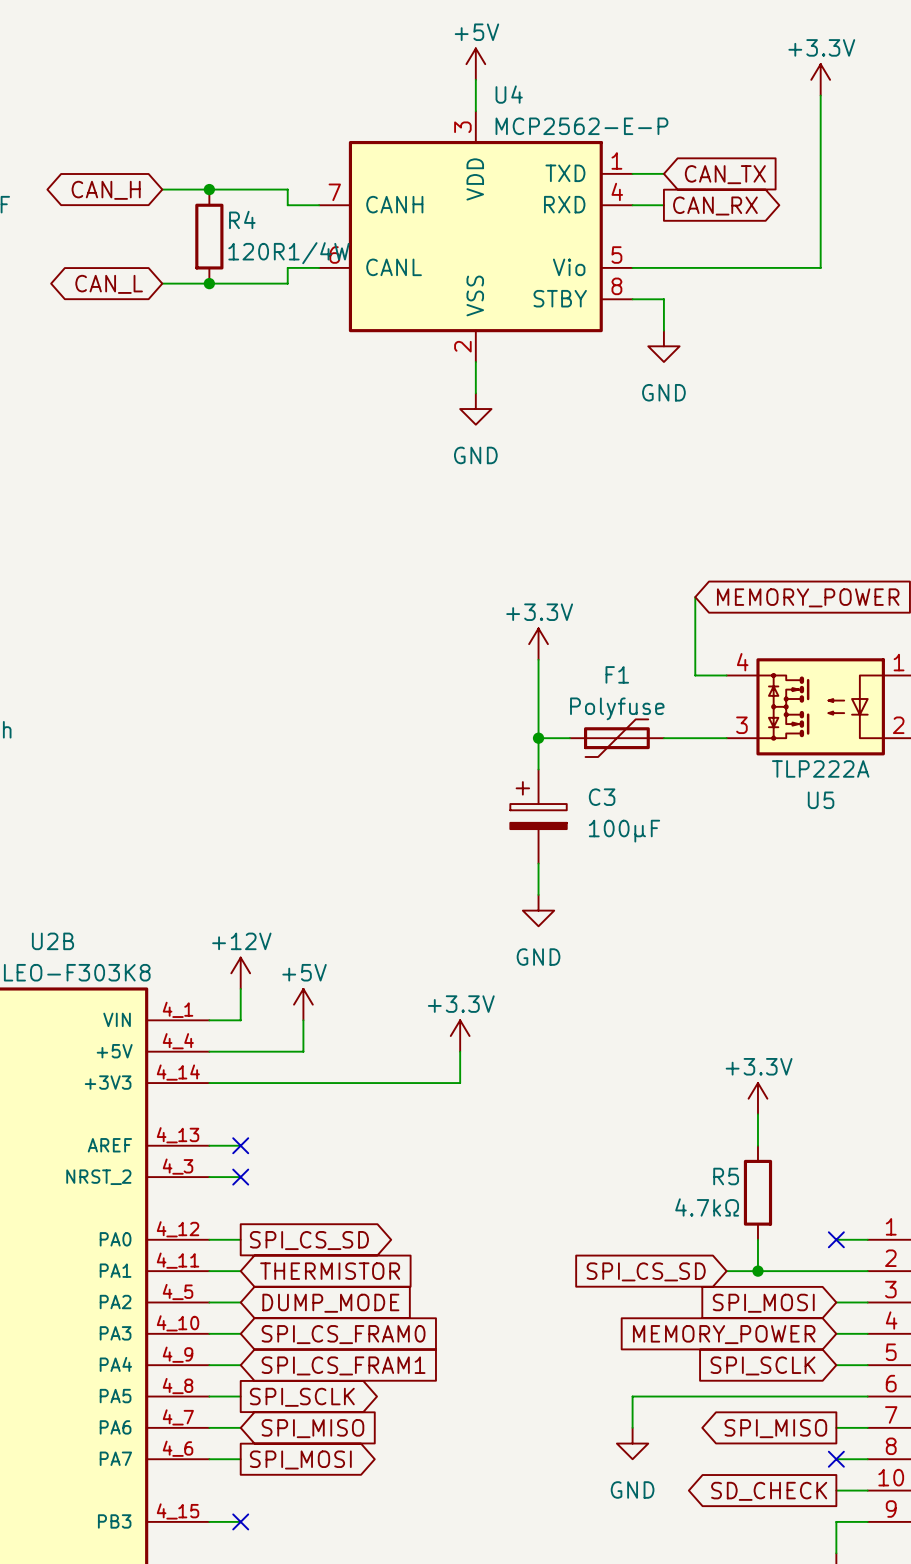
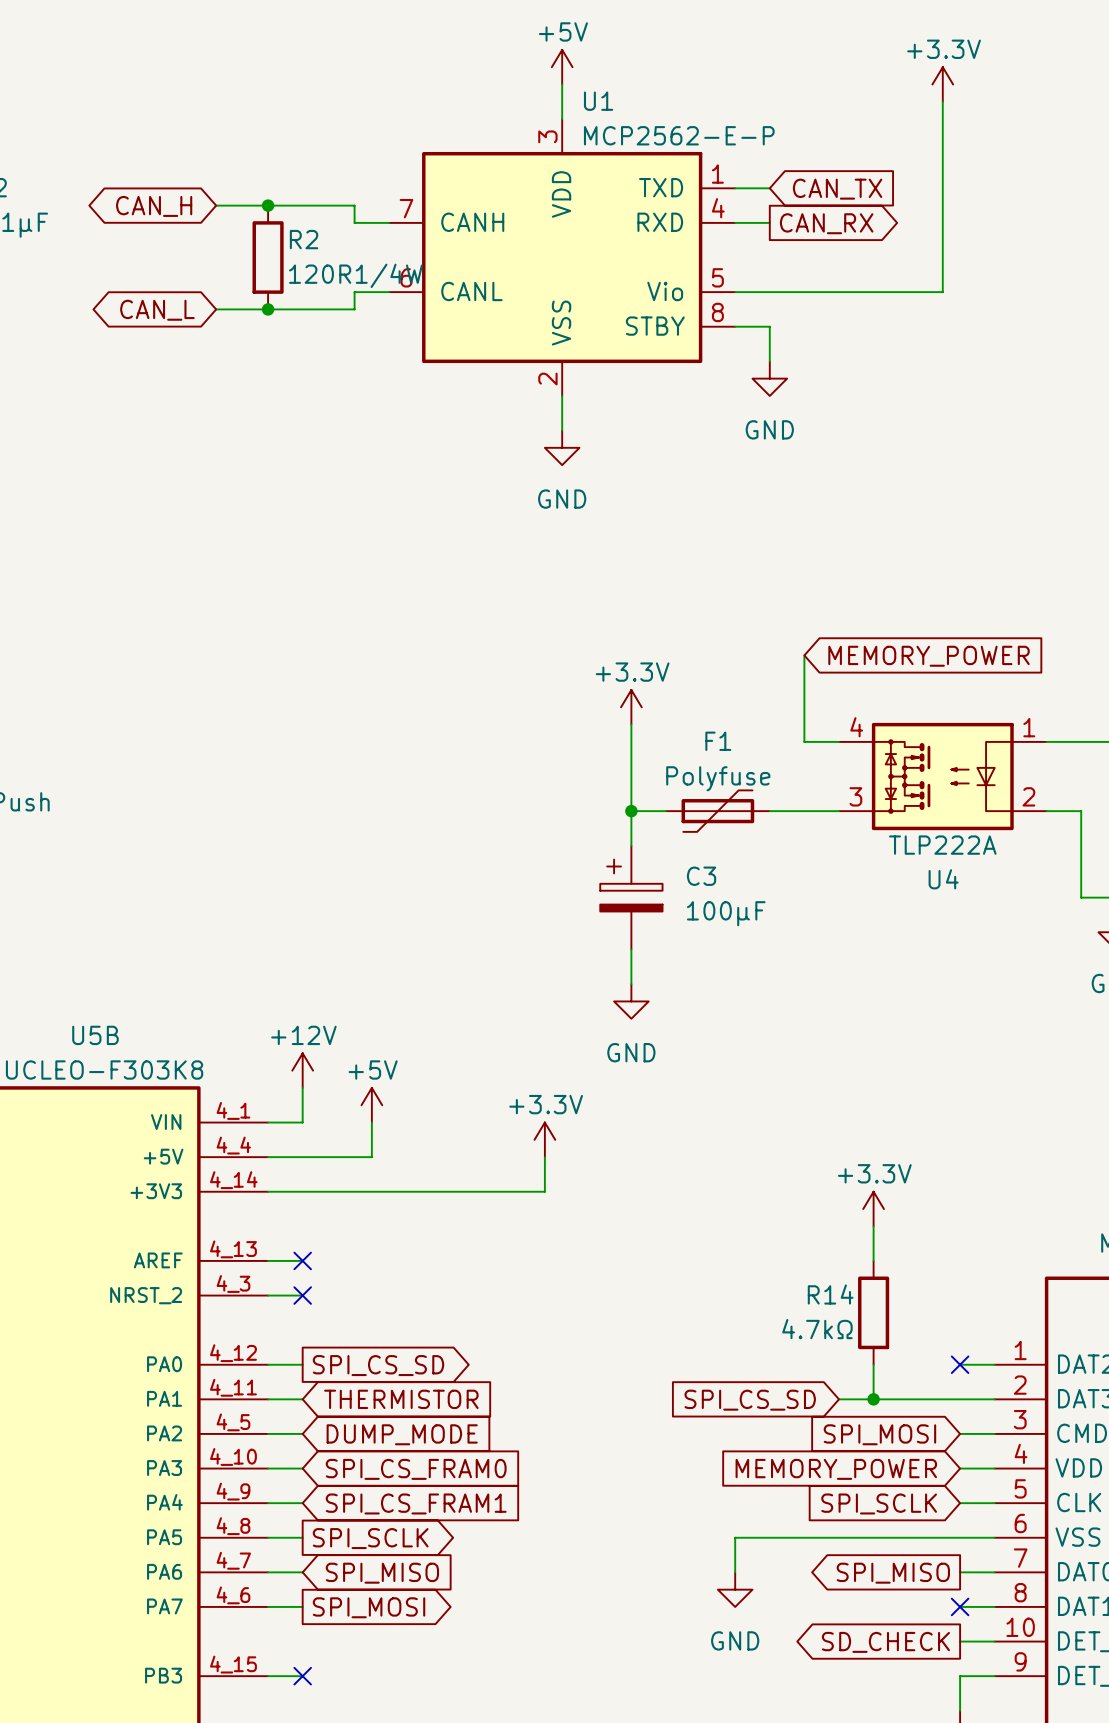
U4 name: U4 (509, 94) -> U1 (598, 101)
R4 name: R4 (242, 219) -> R2 (304, 239)
U5 name: U5 (821, 800) -> U4 (943, 879)
U2B name: U2B (52, 941) -> U5B (95, 1035)
R5 name: R5 (726, 1176) -> R14 (830, 1294)

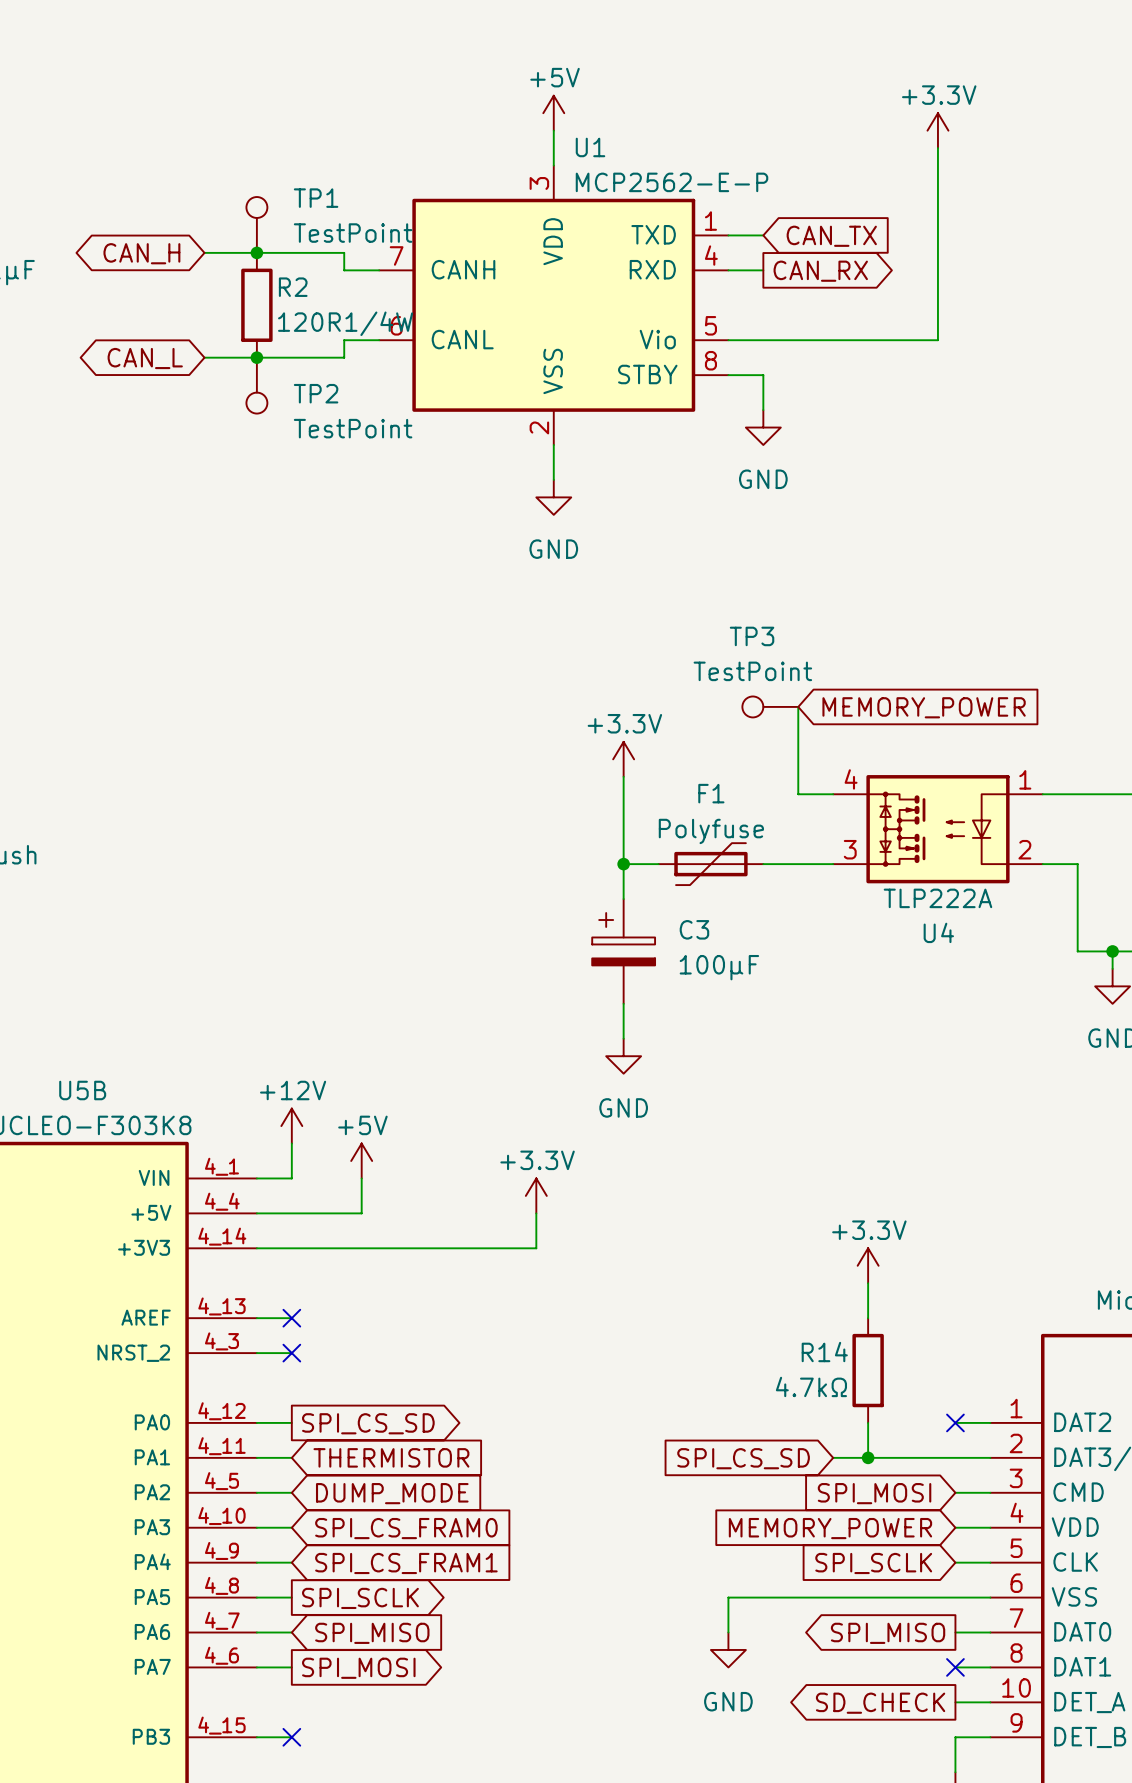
TP1: none -> TestPoint (256, 224)
TP2: none -> TestPoint (256, 385)
TP3: none -> TestPoint (770, 706)

